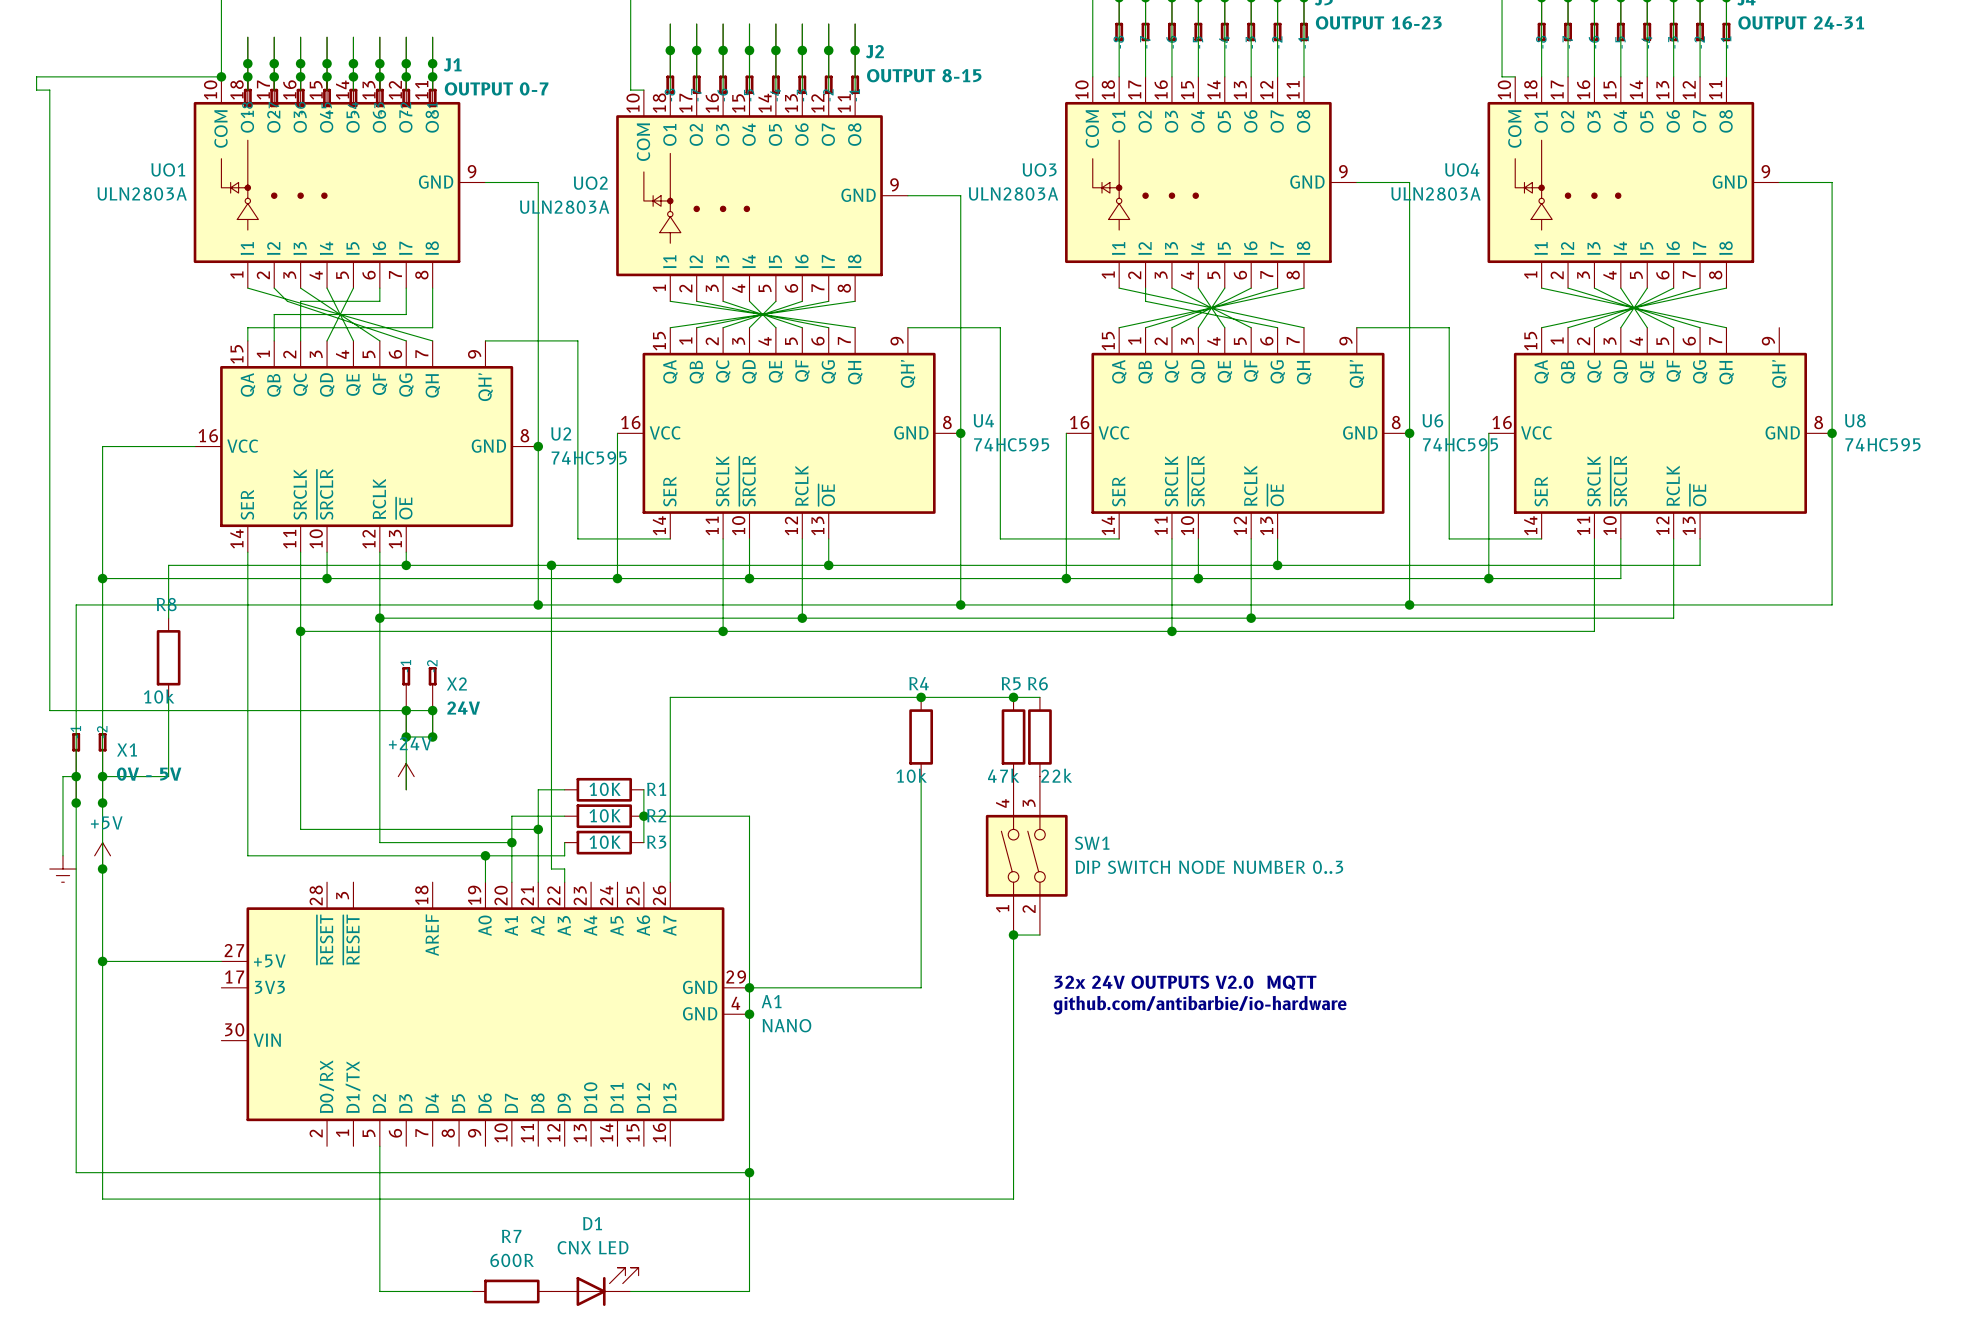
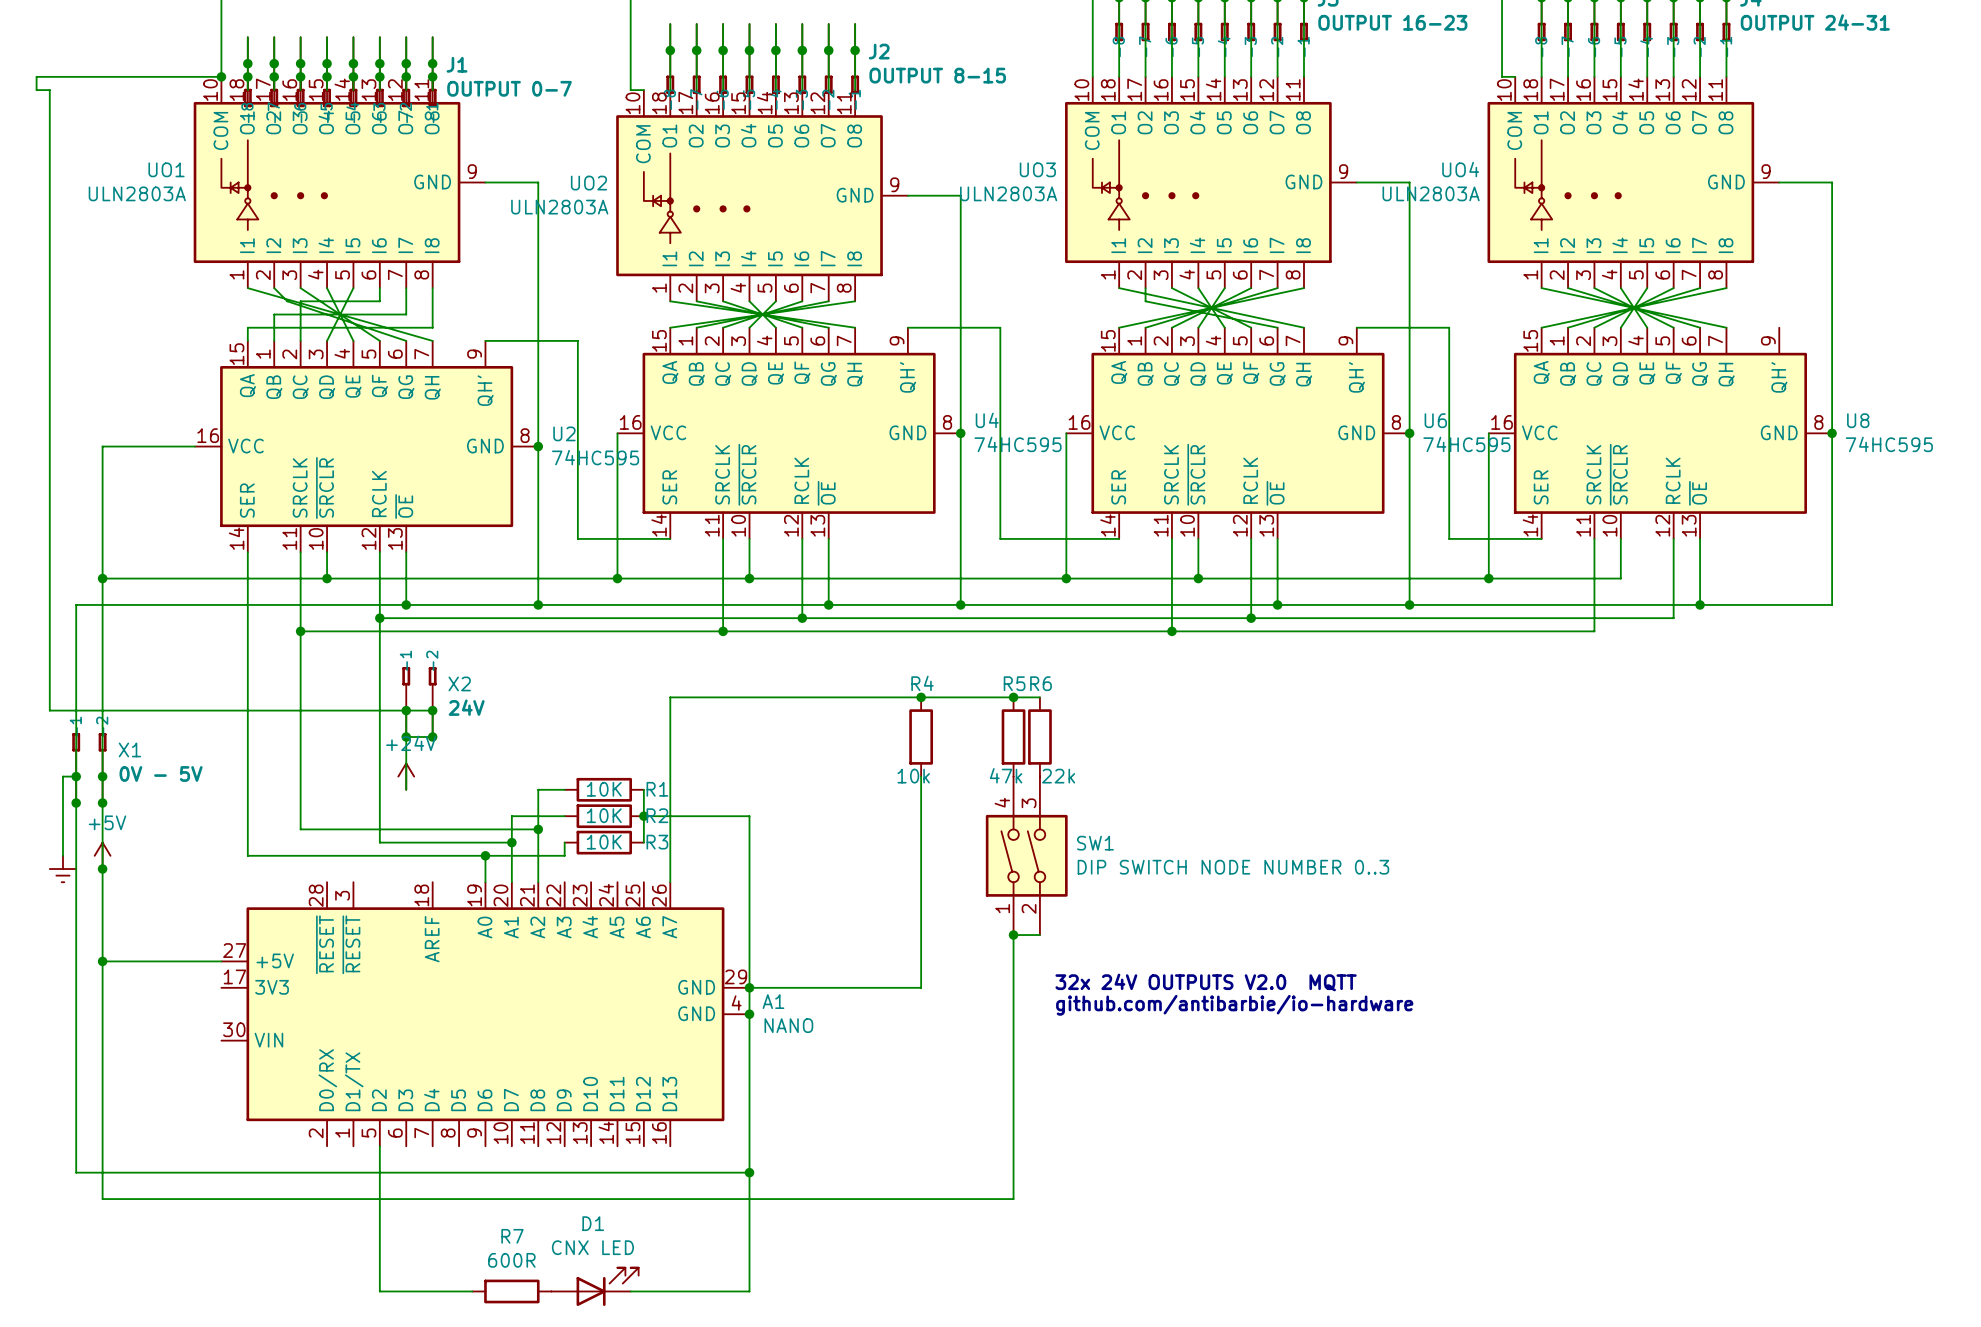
wire: none -> (406, 565) (406, 604)
junction position: (406, 565) -> (406, 604)
wire: (551, 565) (551, 869) (564, 869) (564, 882) -> none
junction: (551, 565) -> none
wire: none -> (828, 565) (828, 604)
junction position: (828, 565) -> (828, 604)
wire: none -> (1277, 565) (1277, 604)
junction position: (1277, 565) -> (1277, 604)
wire: (1700, 565) (168, 565) (168, 618) -> (1700, 565) (1700, 604)
junction: none -> (1700, 604)
R8: 10k (168, 657) -> none
wire: (168, 697) (168, 776) (102, 776) -> none

